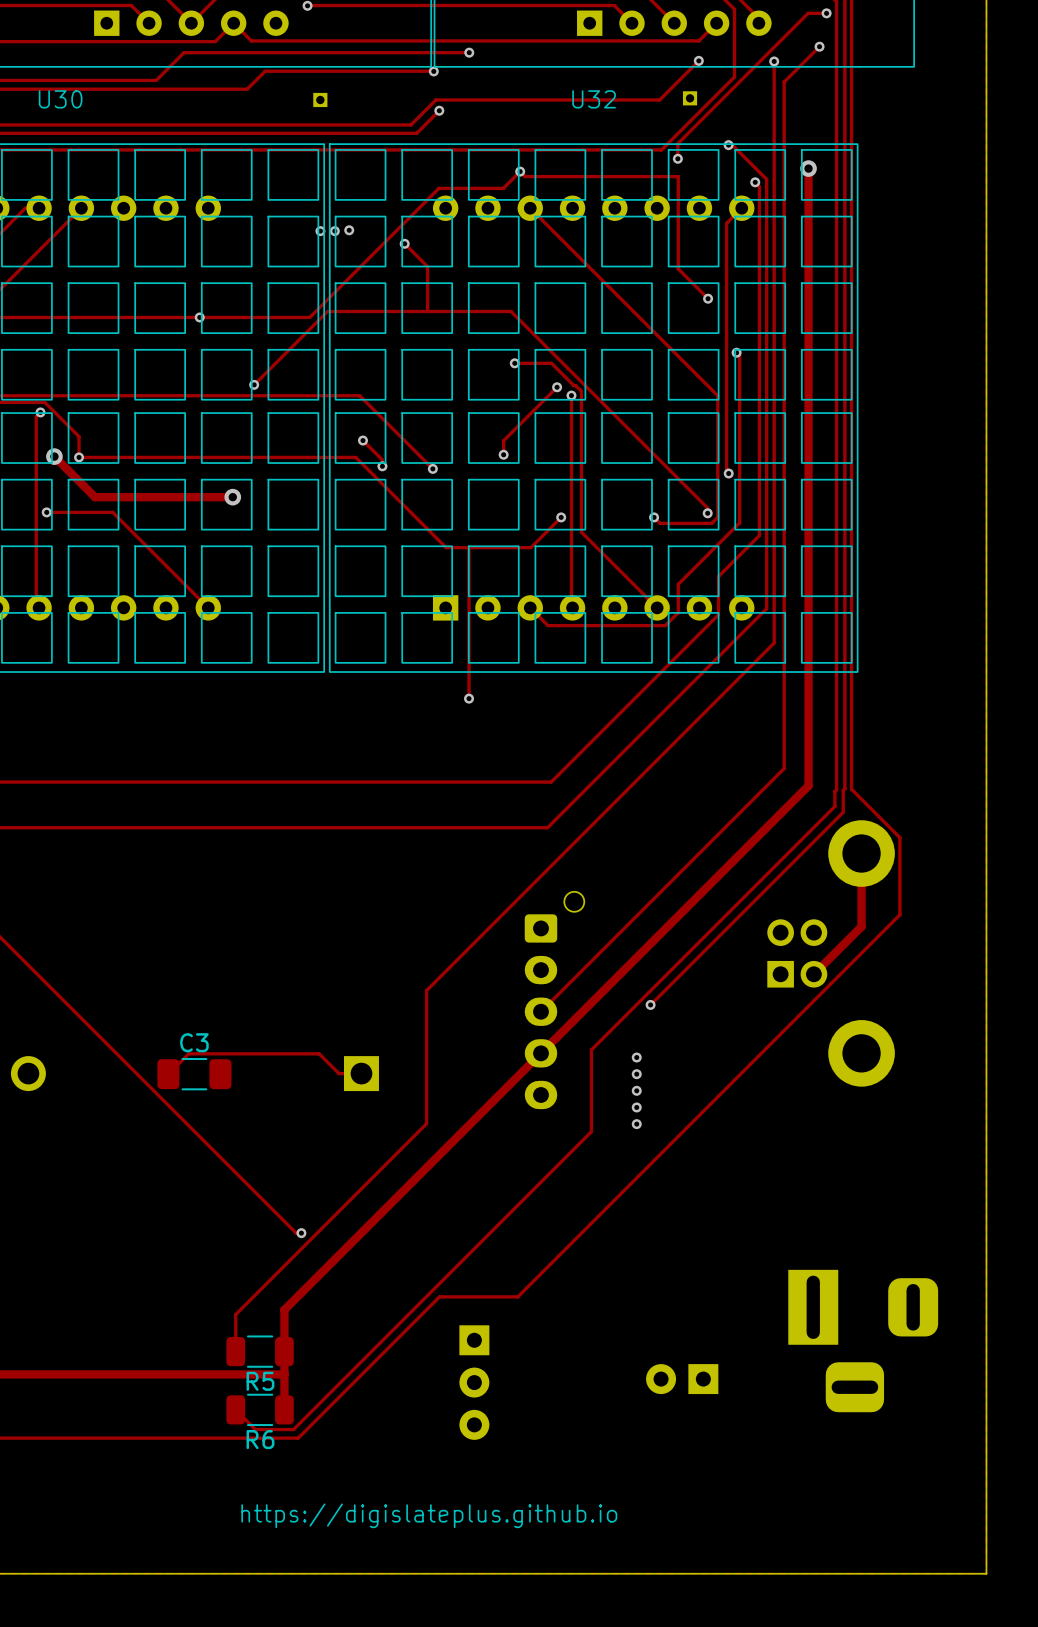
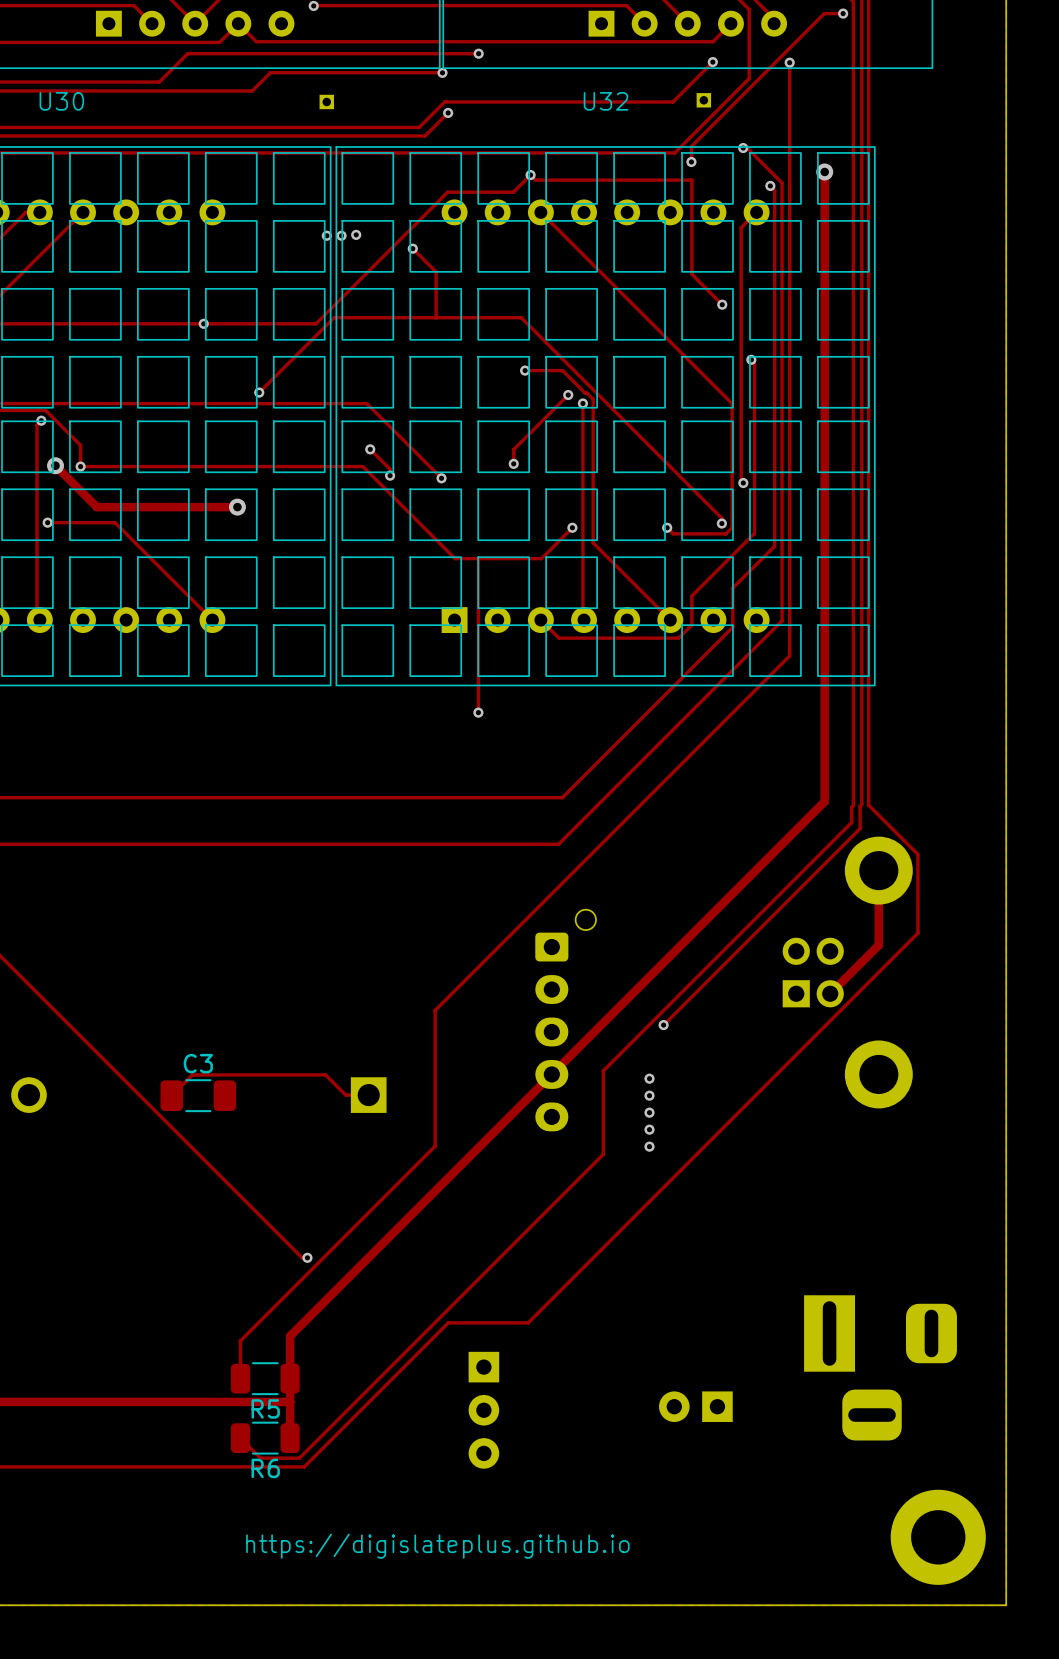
track: (819, 46) (784, 82) (784, 768) (540, 1011) -> none
via: (819, 46) -> none
part: none -> (938, 1537)

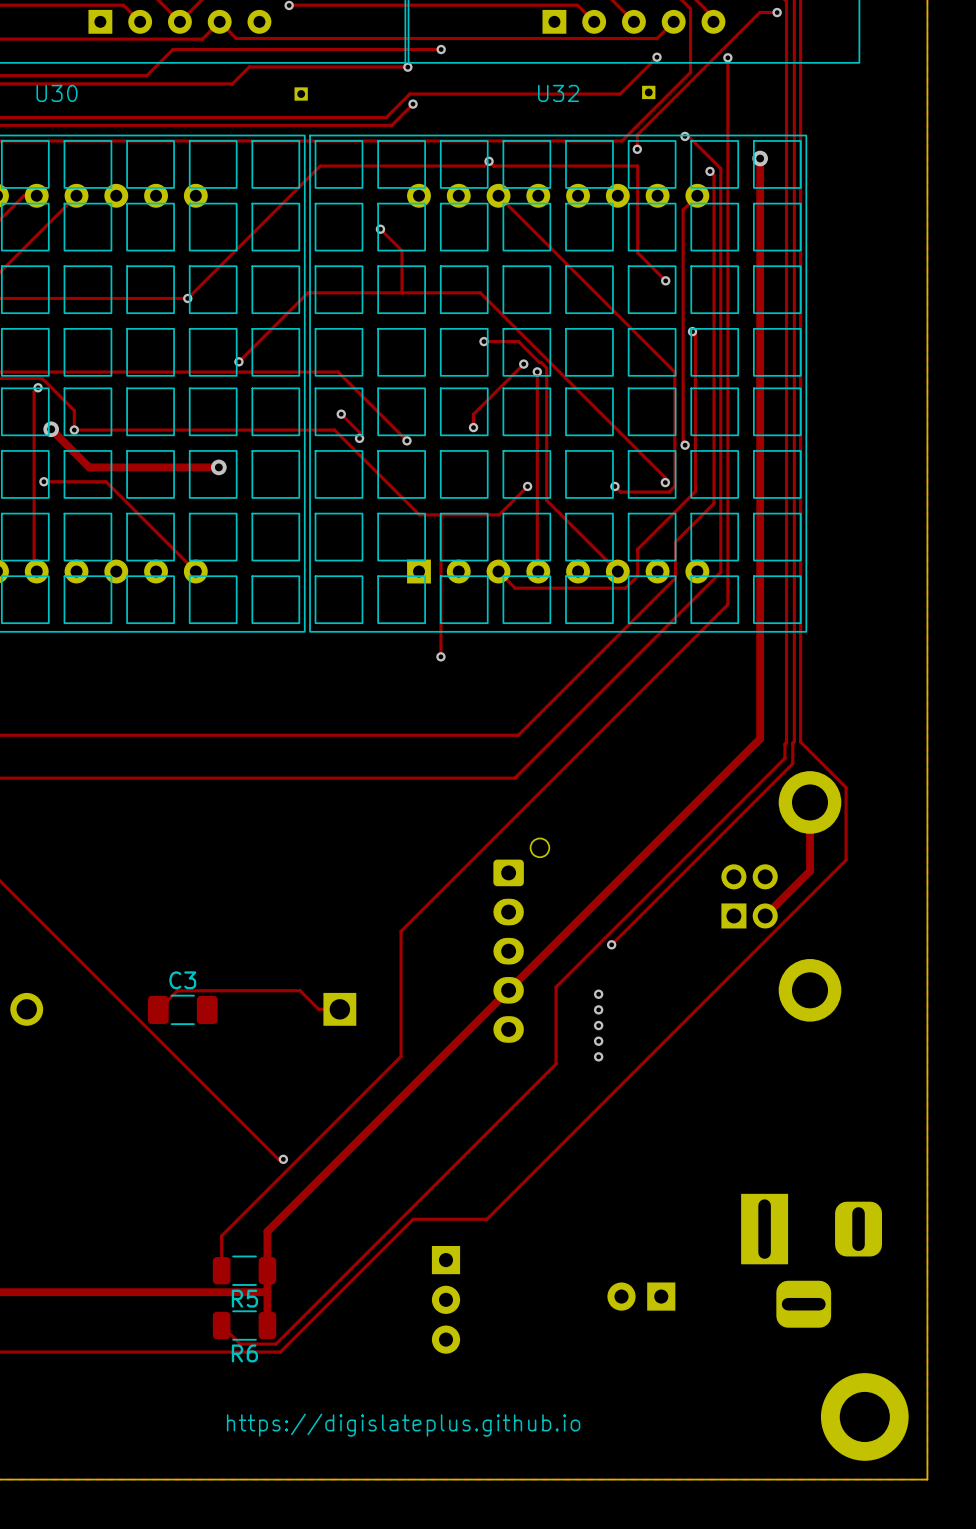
track: (525, 180) (513, 192) (447, 192) (316, 323) (203, 323) -> (484, 166) (320, 166) (187, 298)
via: (356, 234) -> none
via: (326, 235) -> none
via: (341, 235) -> none

